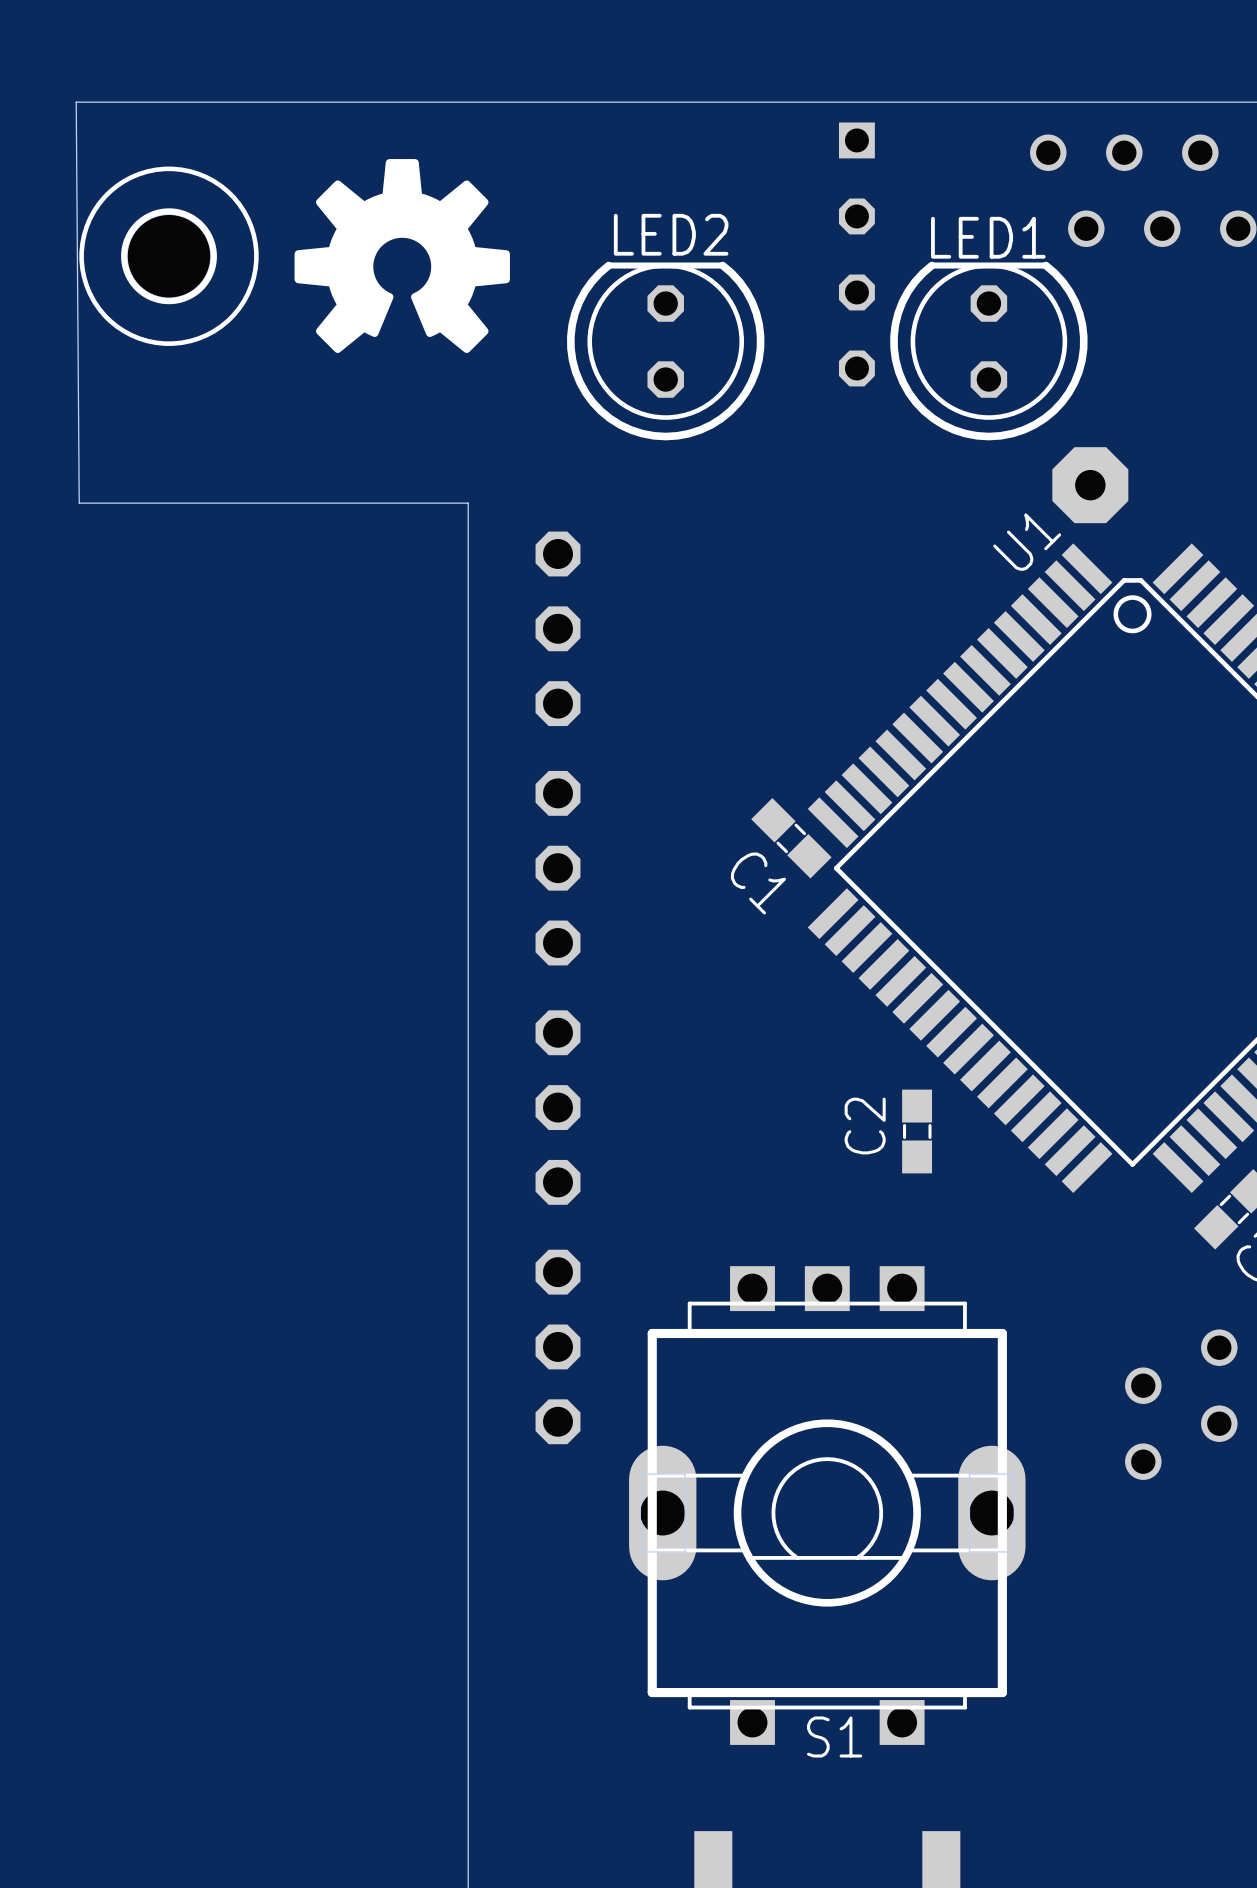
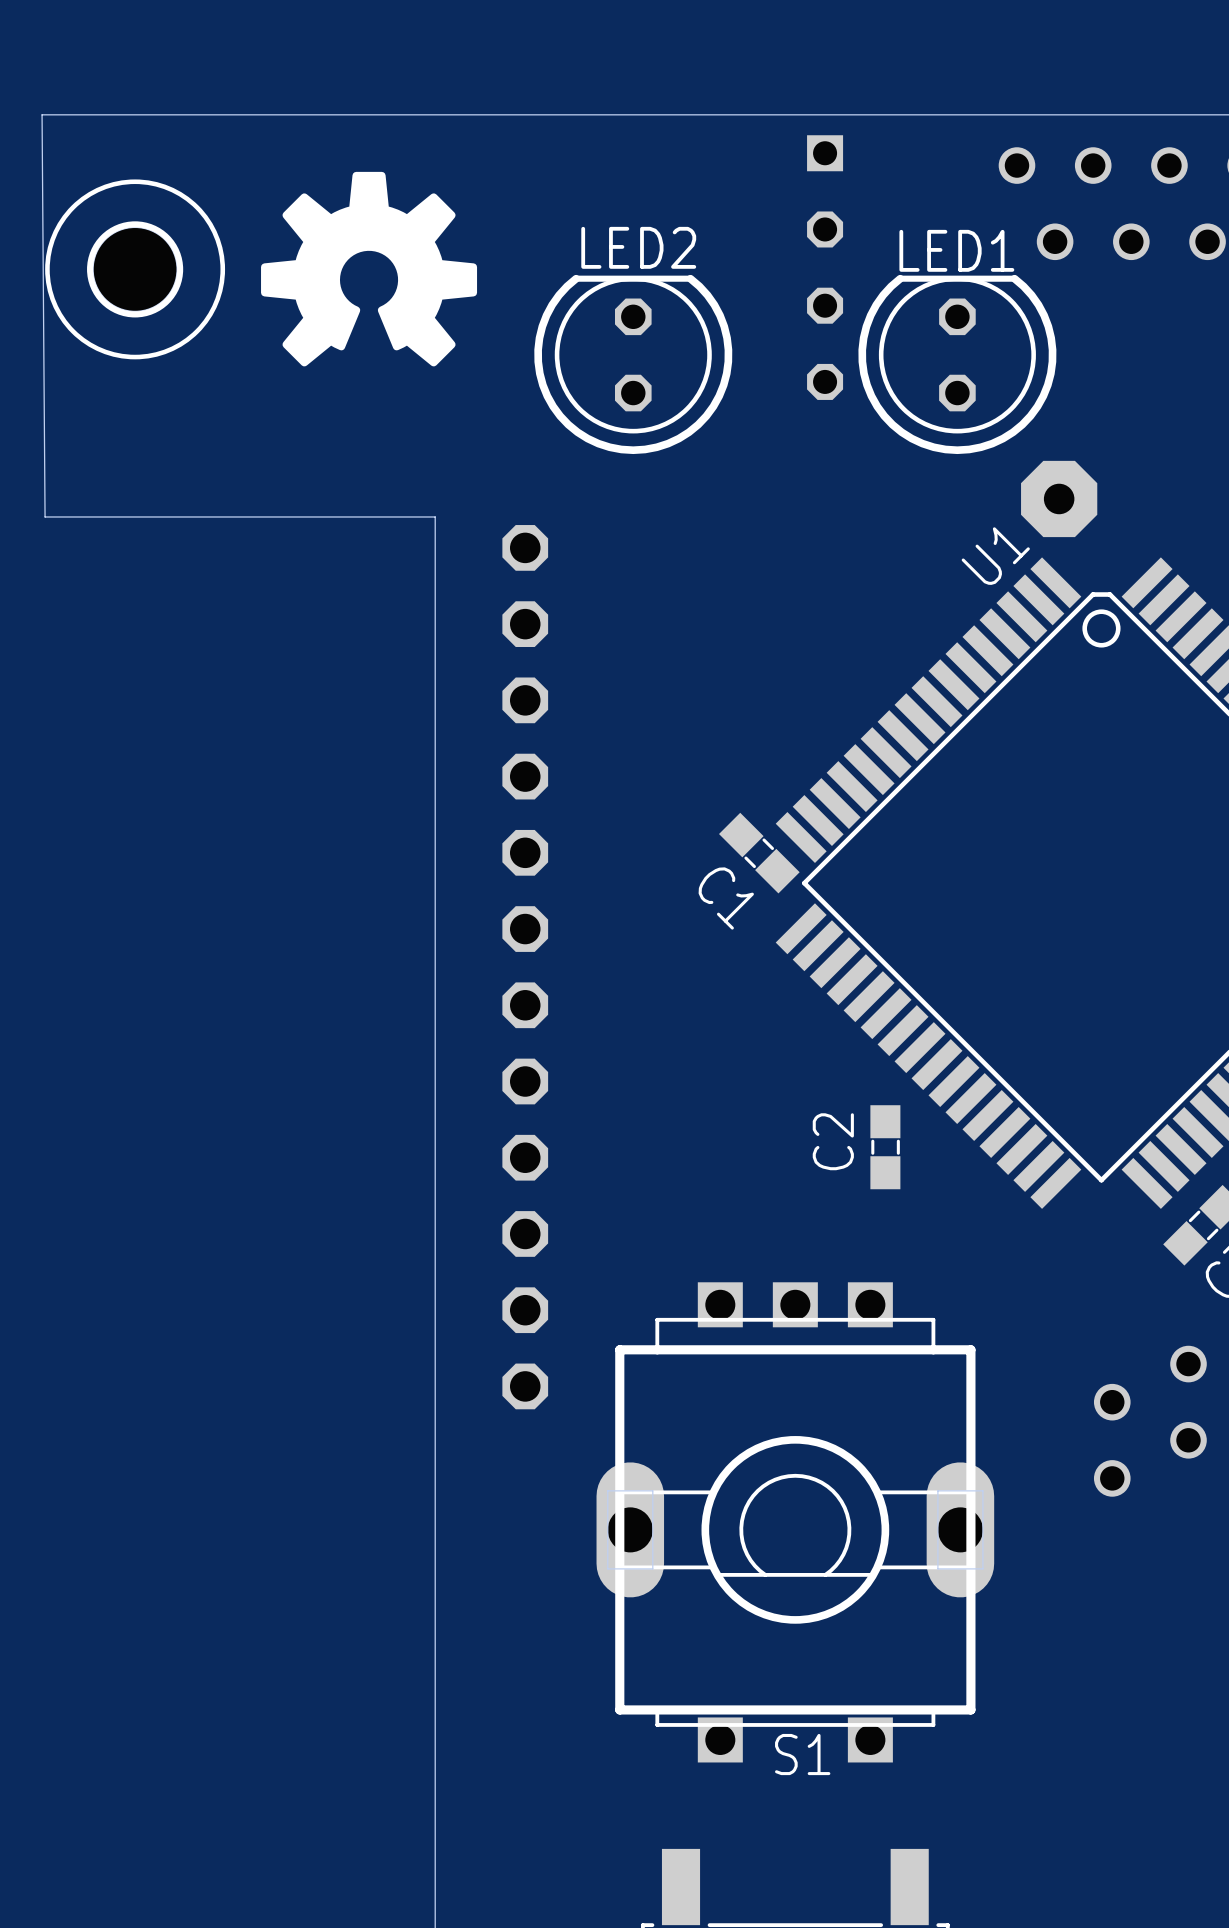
part: (558, 628) -> none
part: (558, 868) -> none
part: none -> (525, 967)
part: (558, 1107) -> none
part: (558, 1346) -> none

